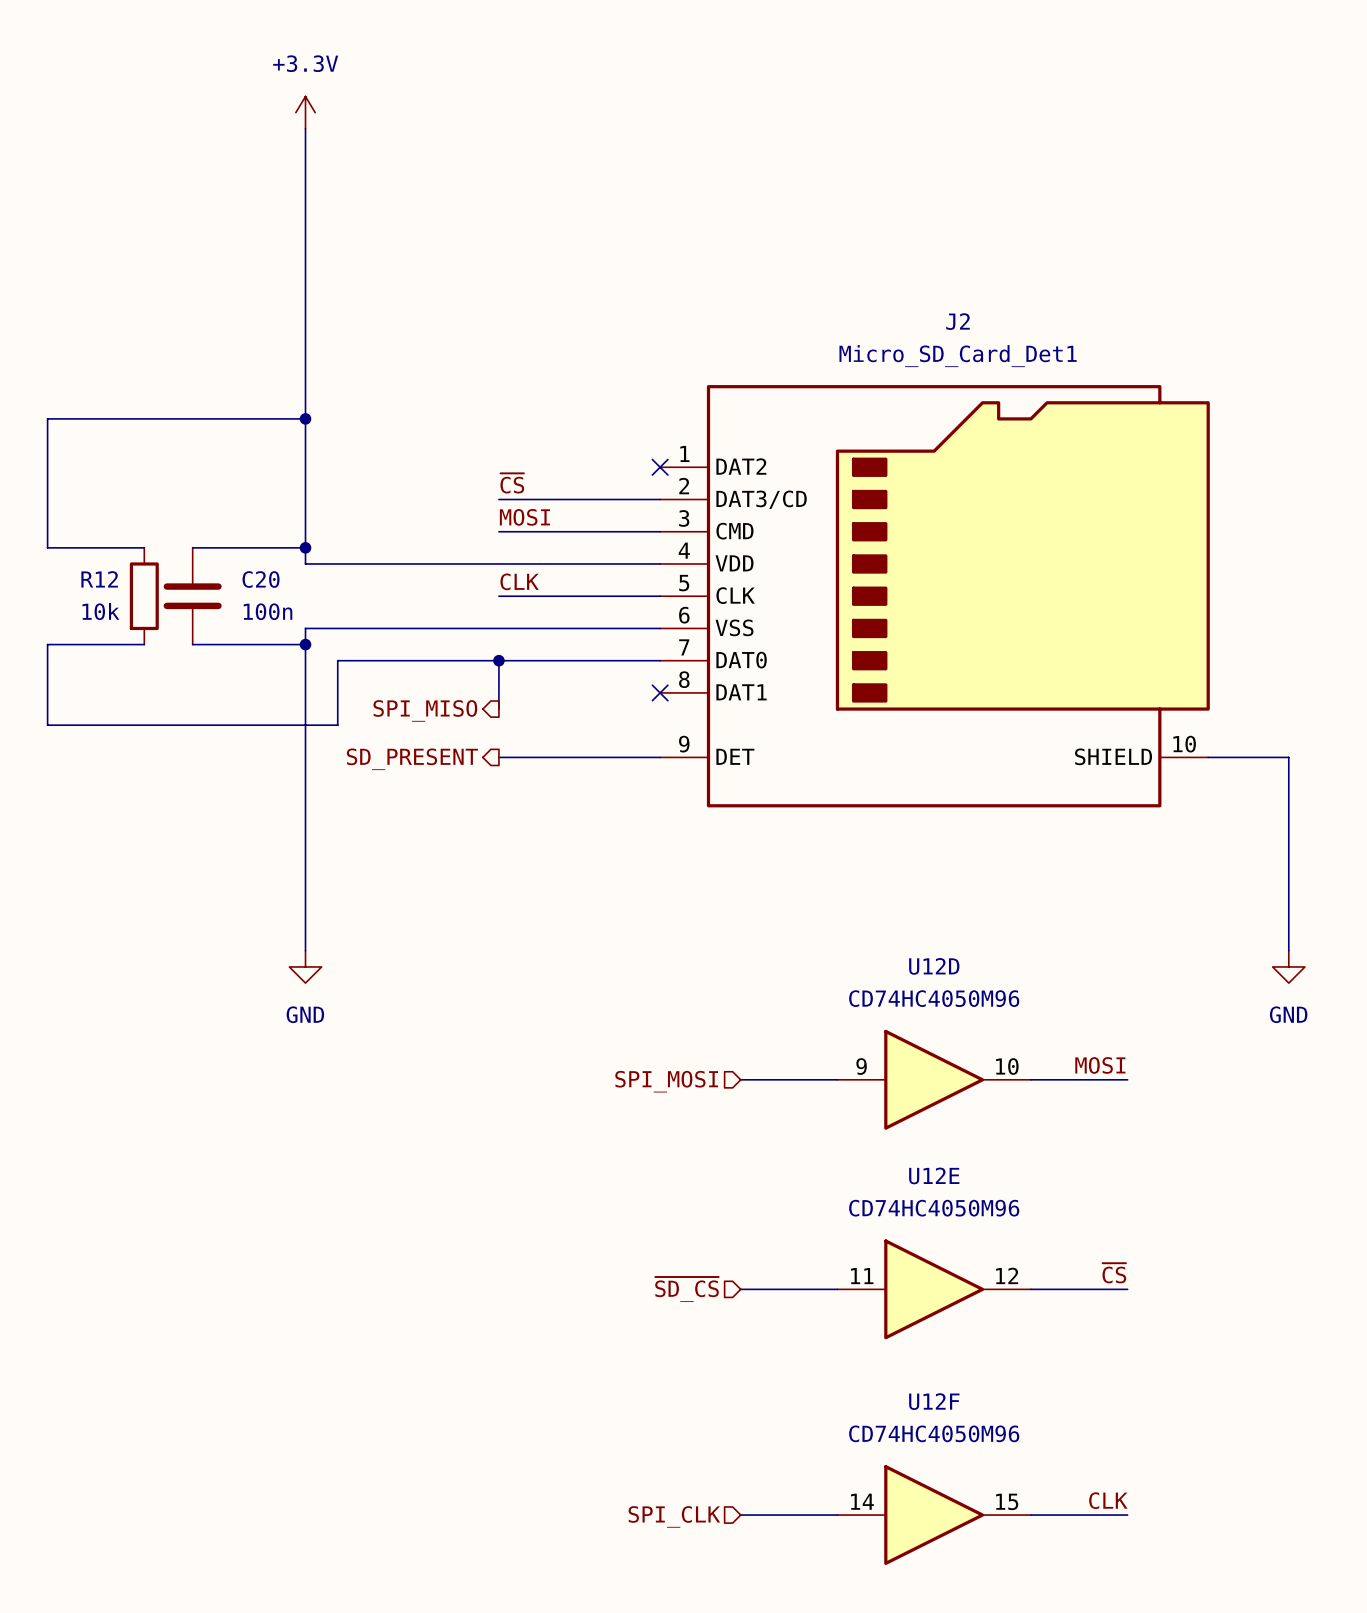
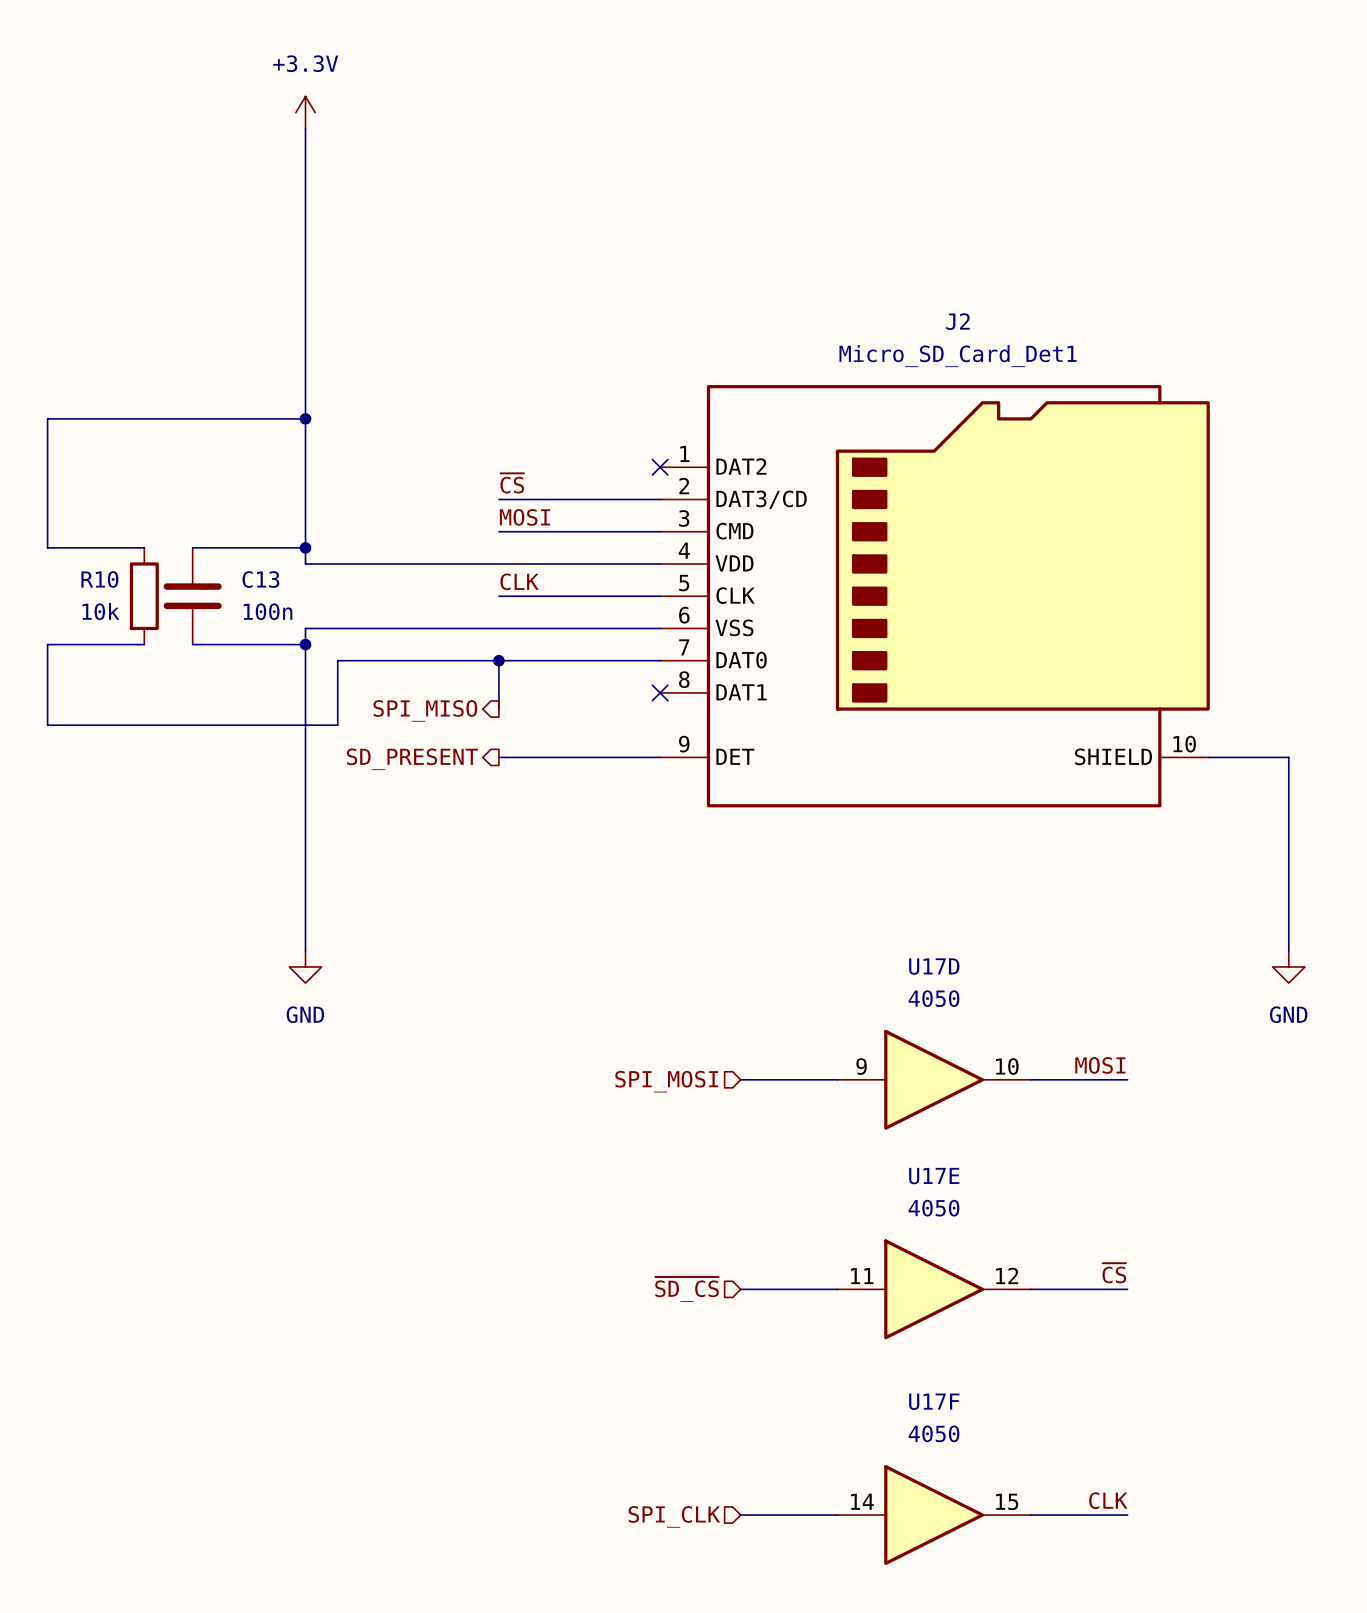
R12 name: R12 (99, 579) -> R10 (99, 579)
C20 name: C20 (261, 579) -> C13 (260, 579)
U12D name: U12D (934, 966) -> U17D (934, 966)
U12D value: CD74HC4050M96 (934, 998) -> 4050 (934, 998)
U12E name: U12E (934, 1175) -> U17E (934, 1176)
U12E value: CD74HC4050M96 (934, 1208) -> 4050 (934, 1208)
U12F name: U12F (934, 1401) -> U17F (934, 1401)
U12F value: CD74HC4050M96 (934, 1433) -> 4050 (934, 1433)

